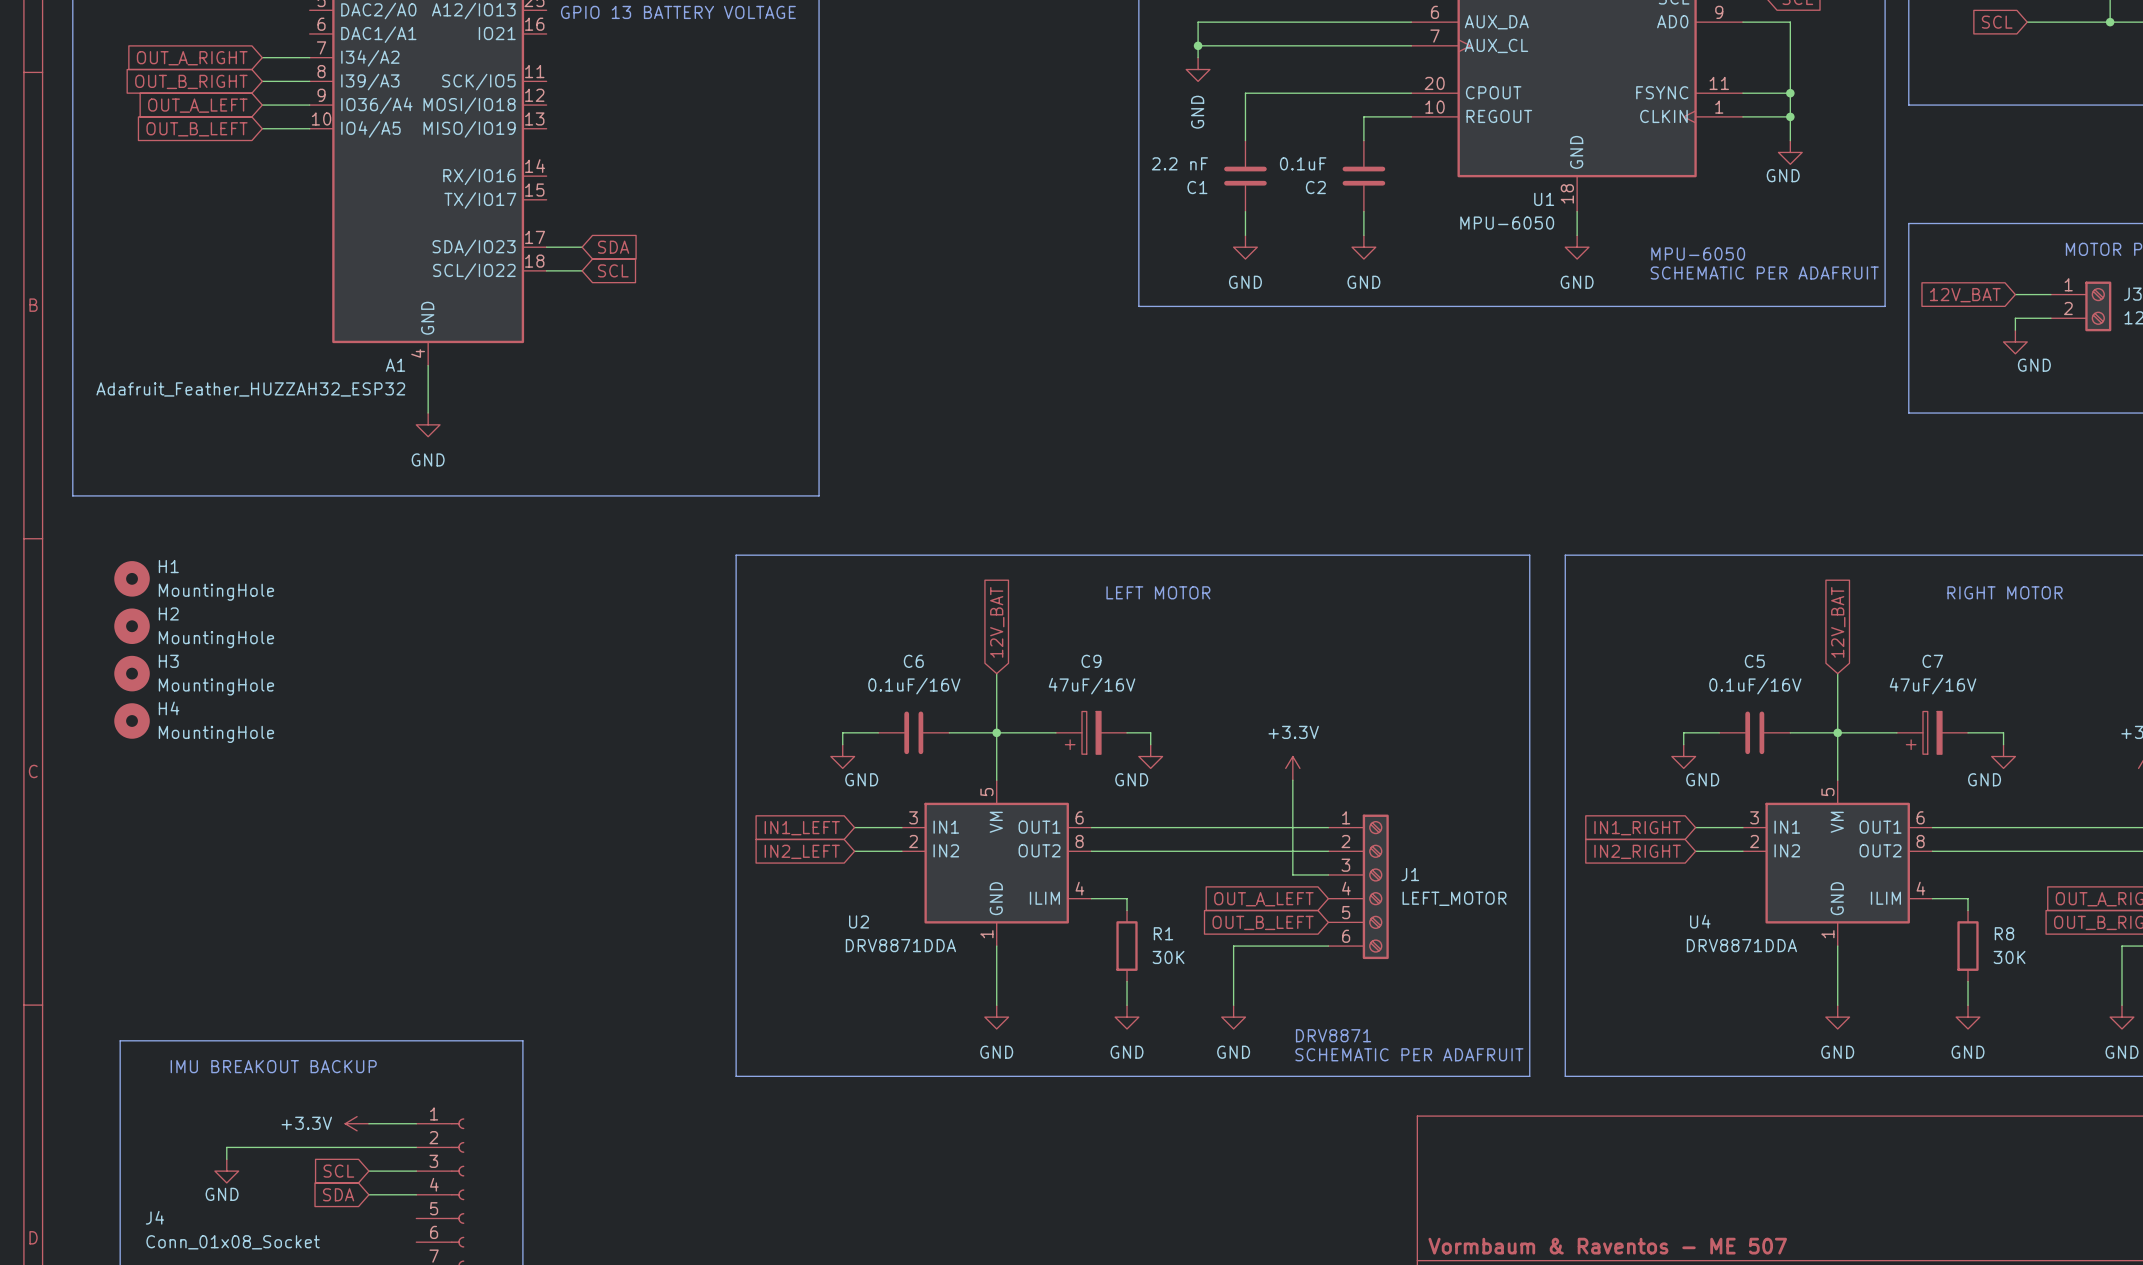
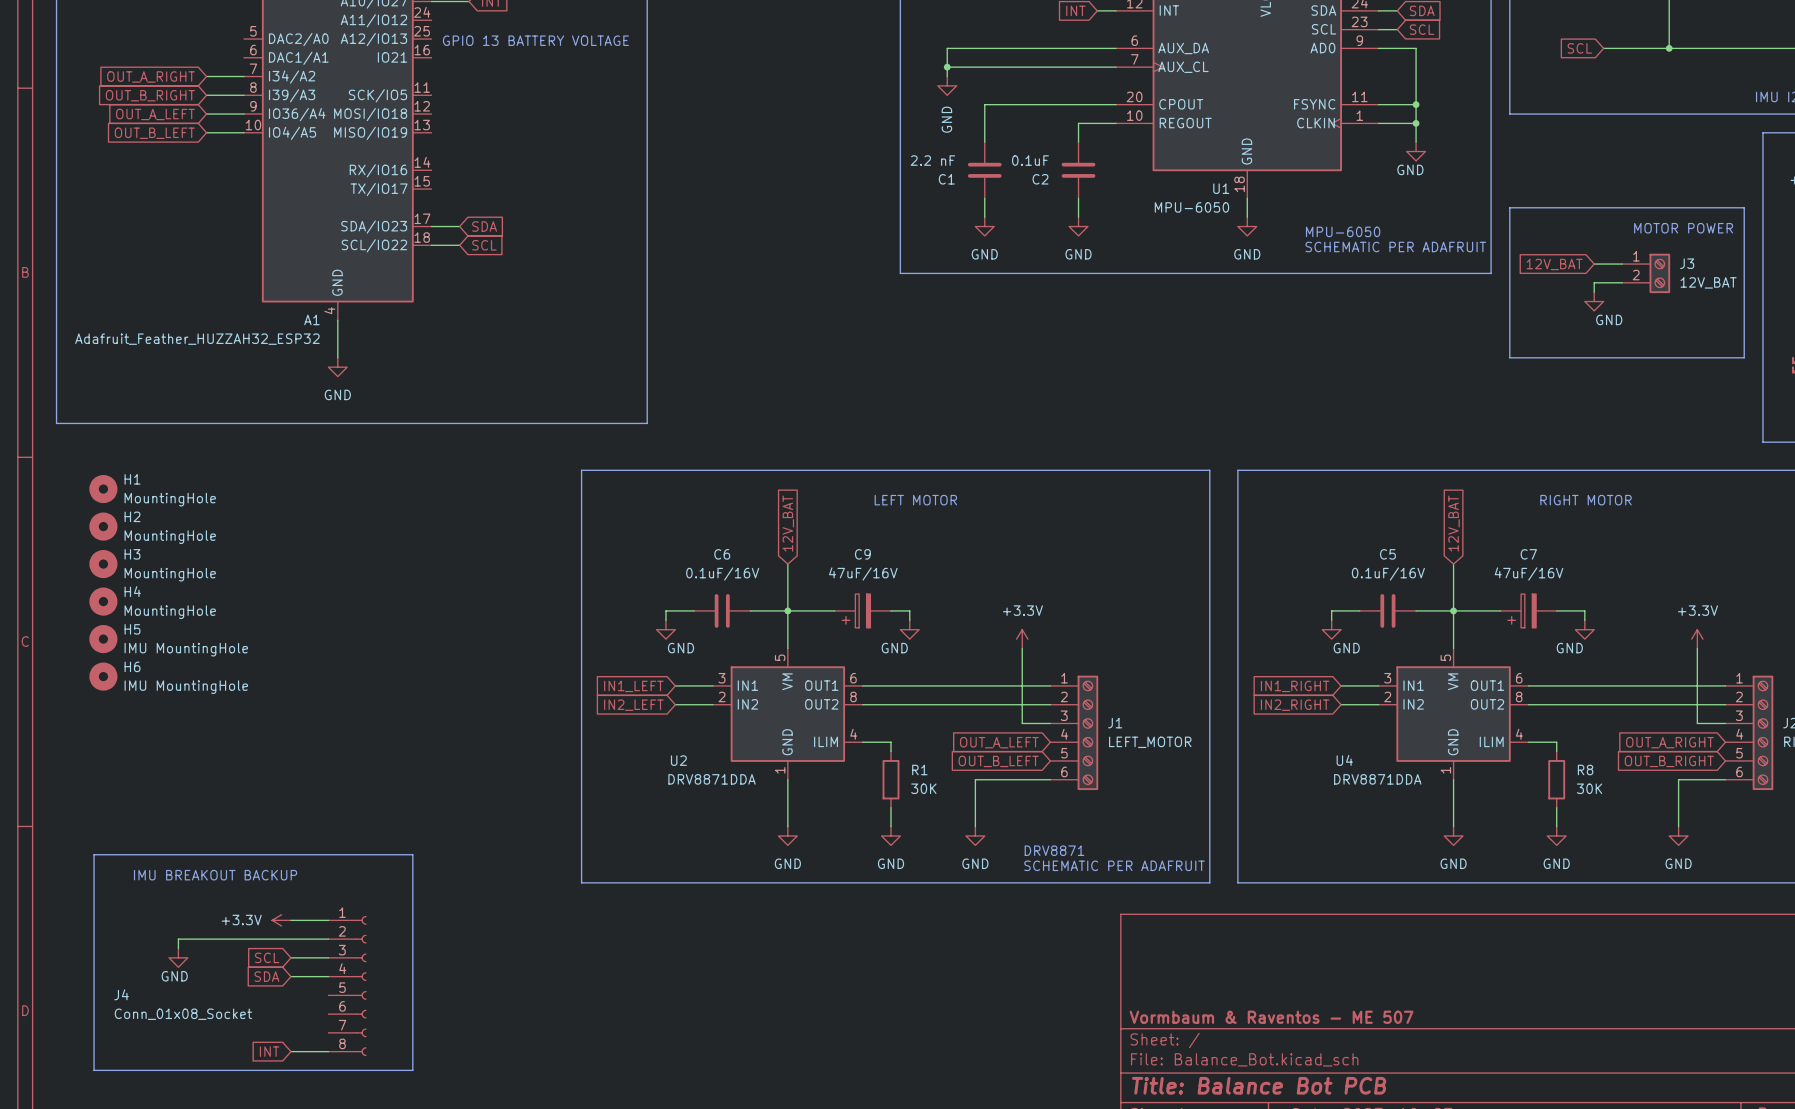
H5: none -> IMU MountingHole (103, 639)
H6: none -> IMU MountingHole (103, 676)

